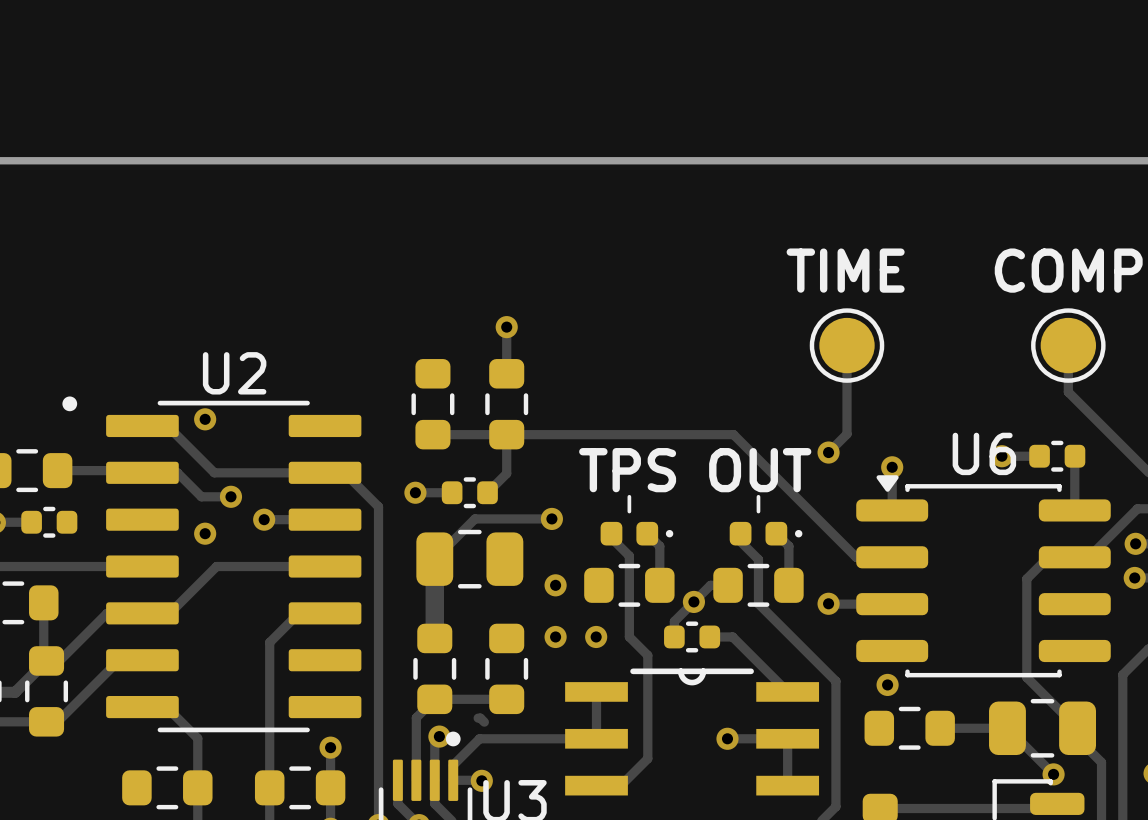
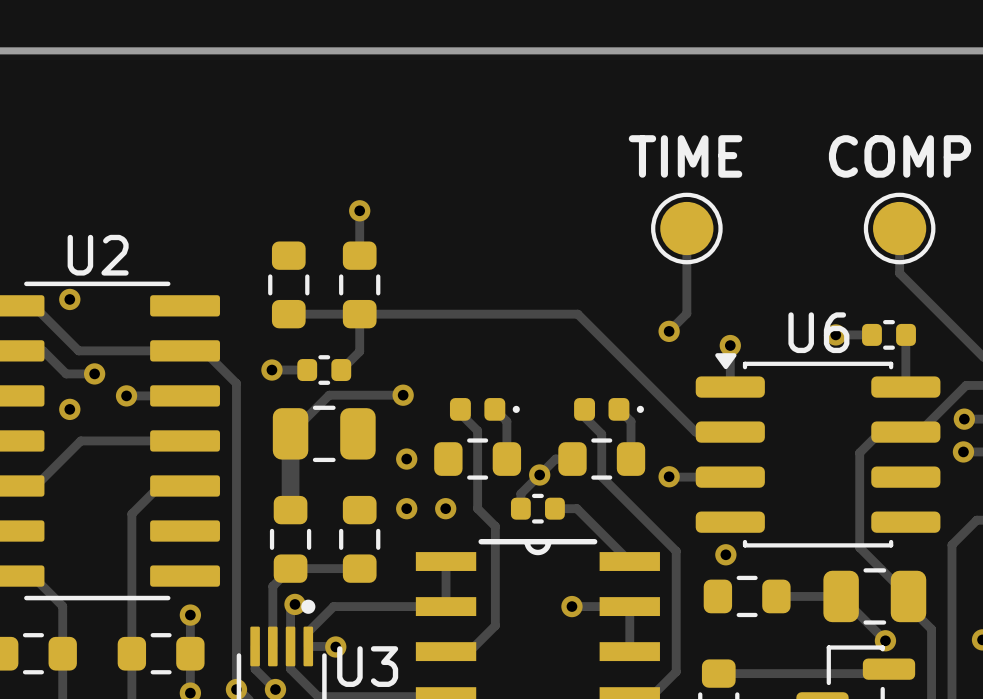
text: TPS (627, 470) -> none
text: OUT (760, 470) -> none
line: (629, 496) (629, 511) -> none
line: (758, 496) (758, 511) -> none
track: (478, 718) (484, 722) -> none

